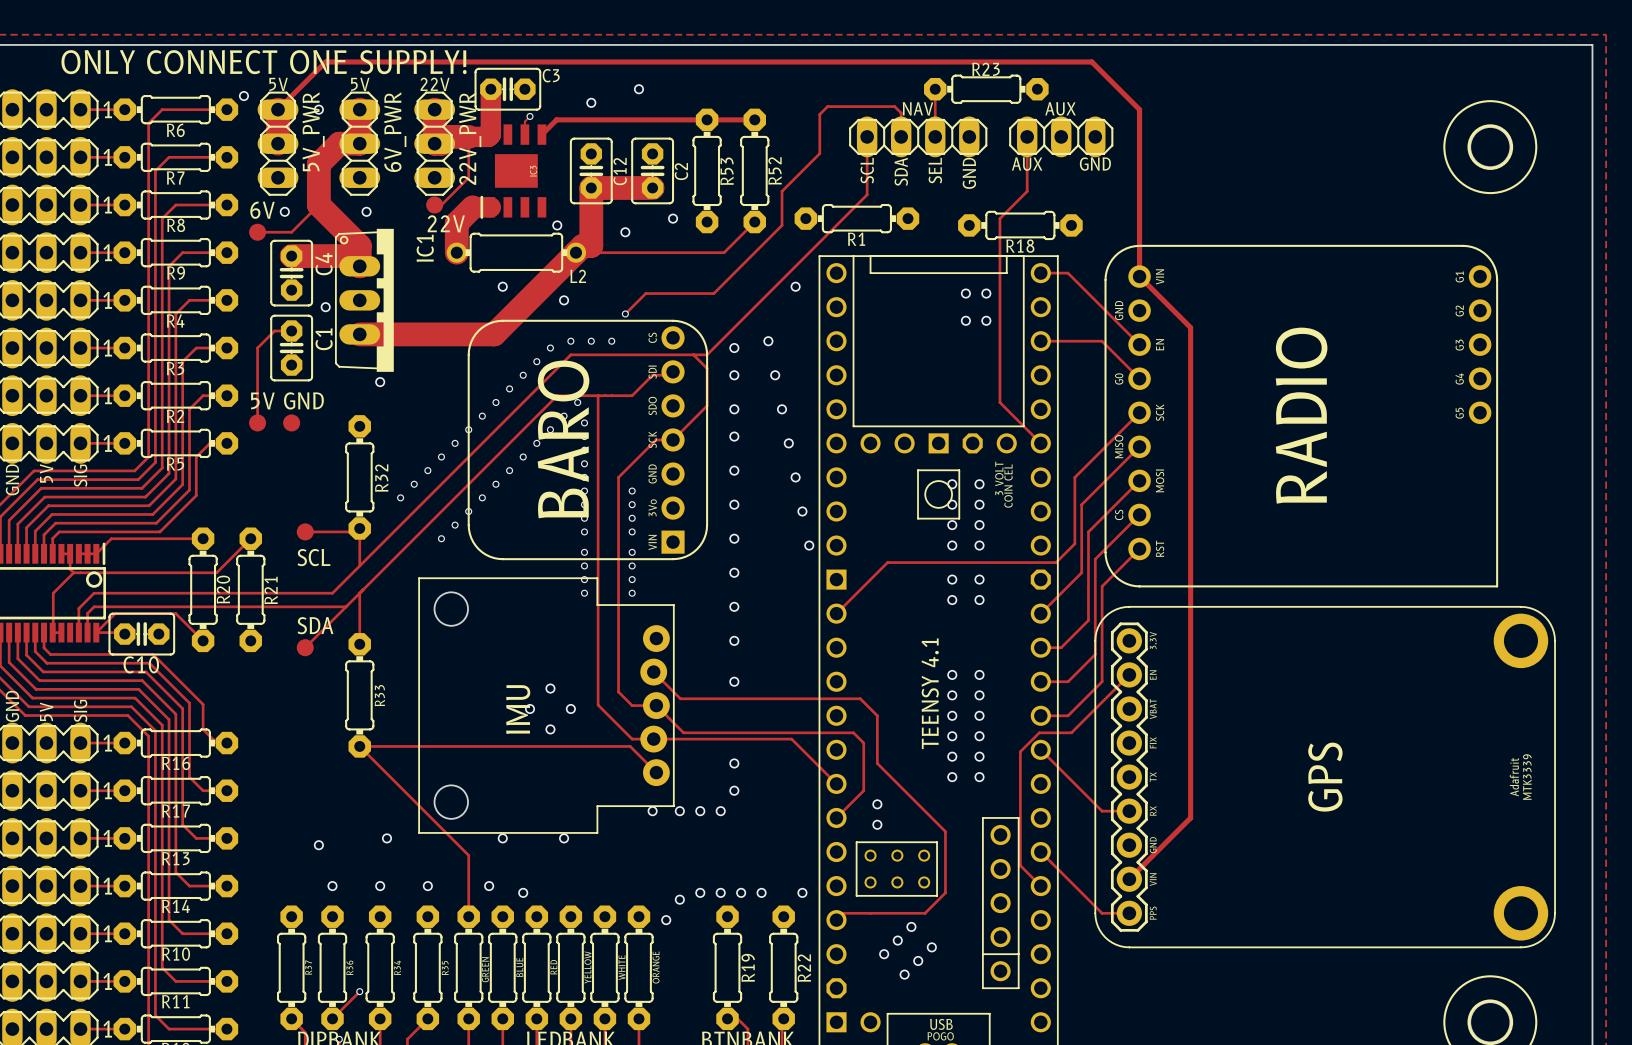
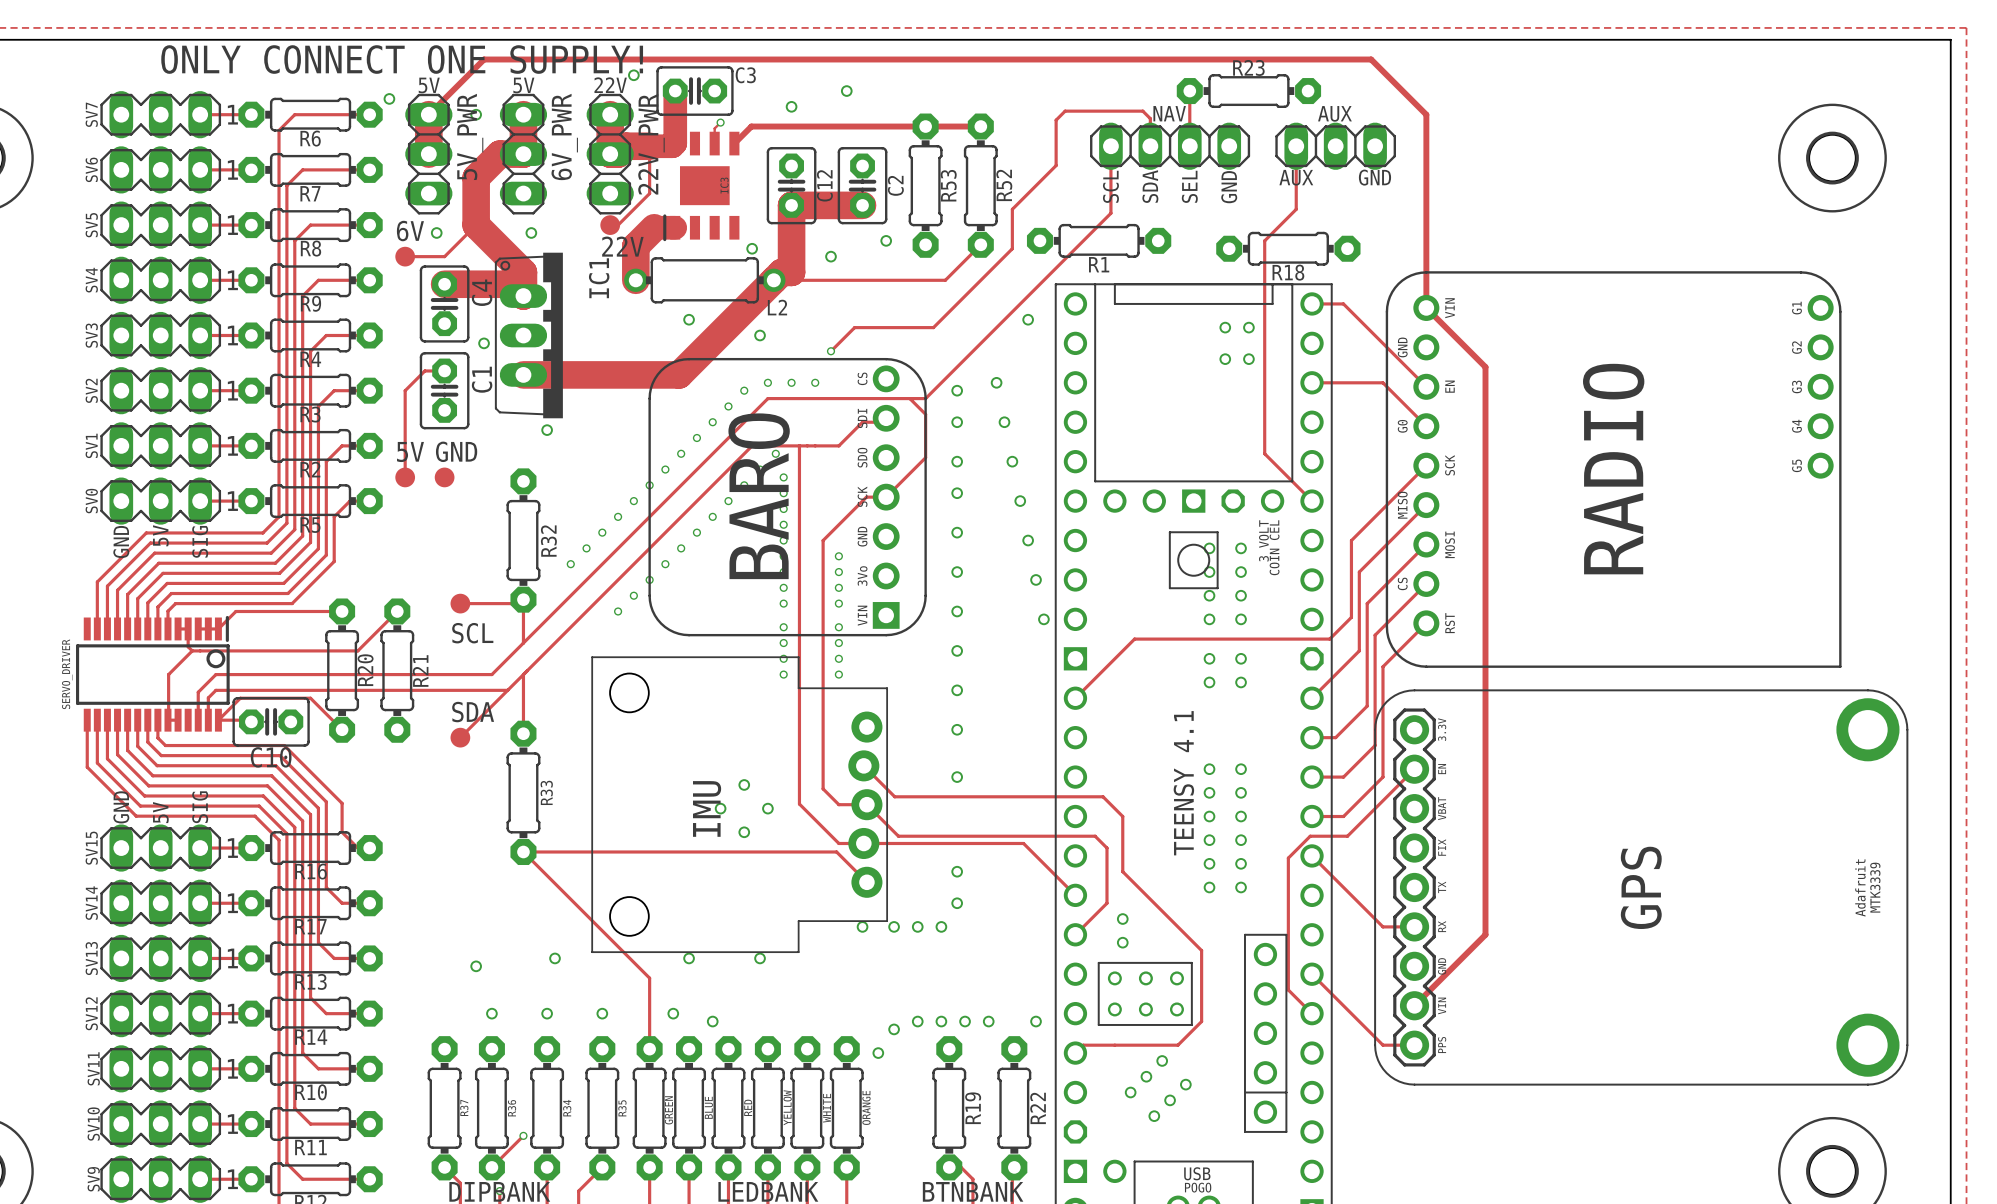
via: none -> (633, 75)

